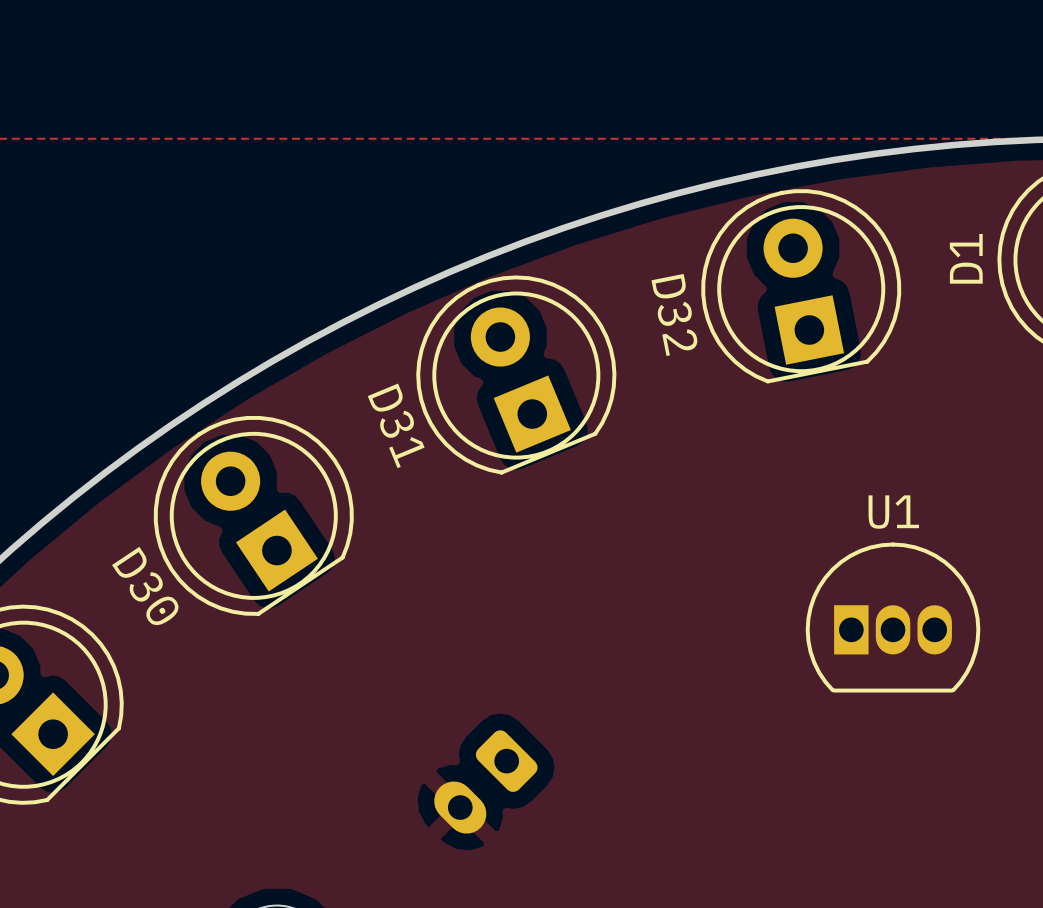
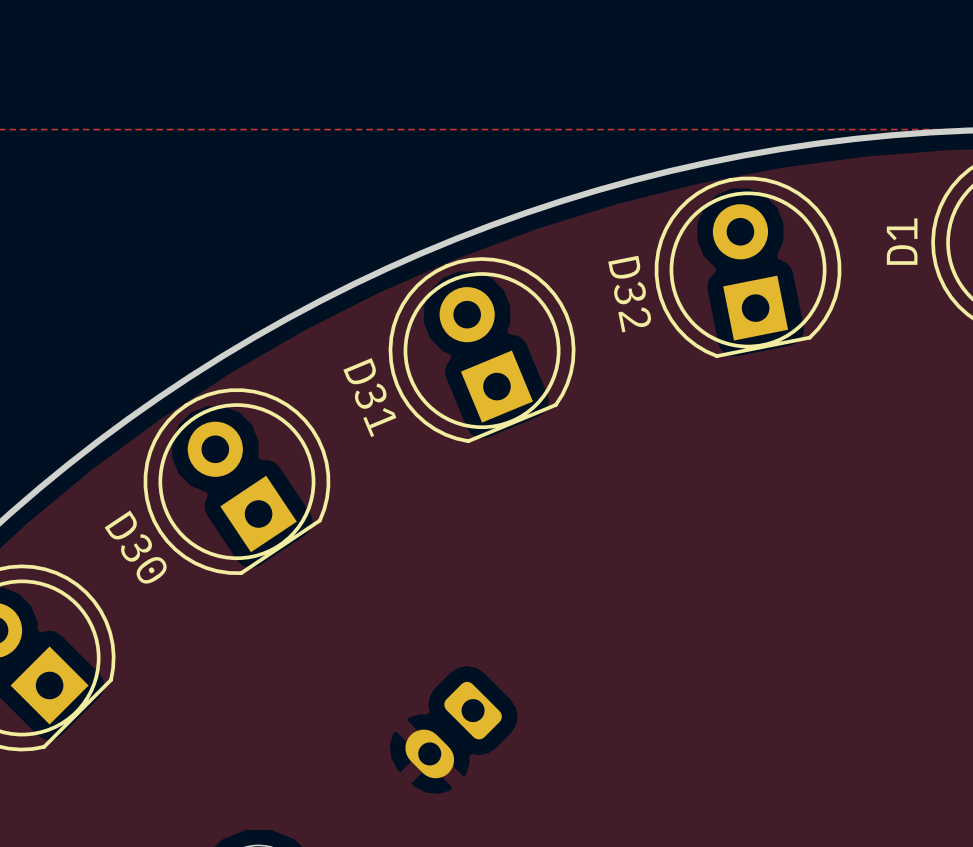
U1: (893, 617) -> none

